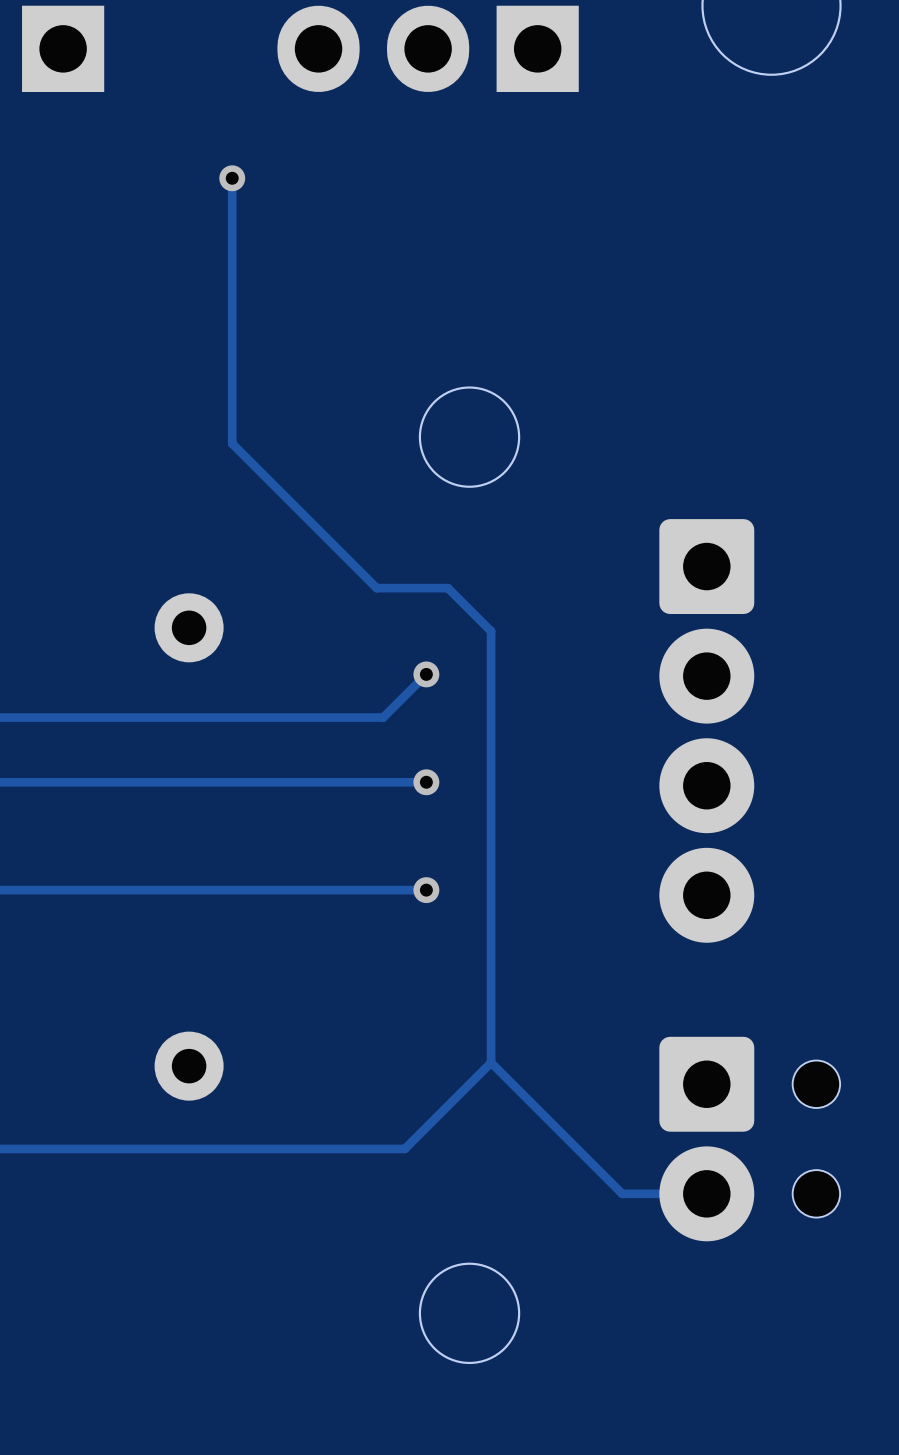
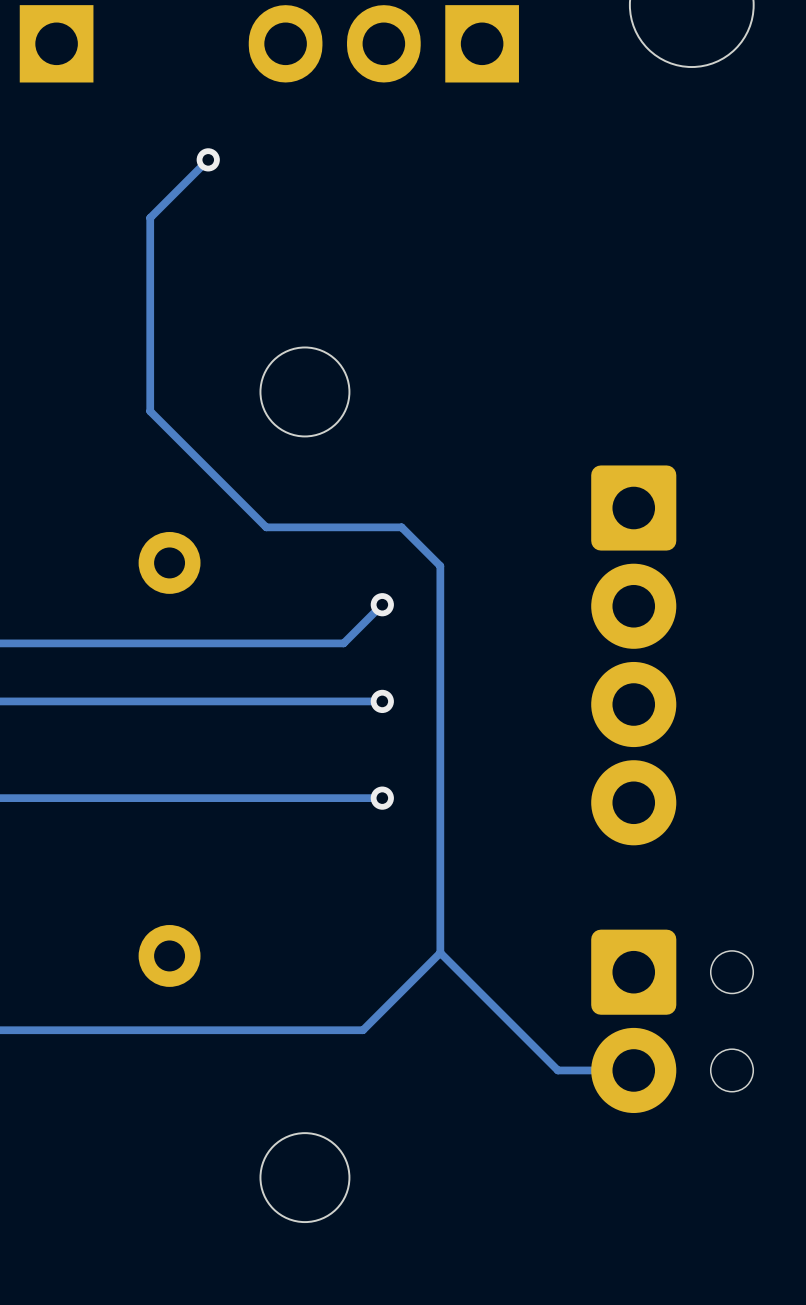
track: (232, 178) (232, 443) (376, 588) -> (208, 159) (150, 217) (150, 411) (266, 527) (337, 527)
round board edge position: (469, 437) -> (304, 391)
round board edge position: (469, 1313) -> (304, 1177)

